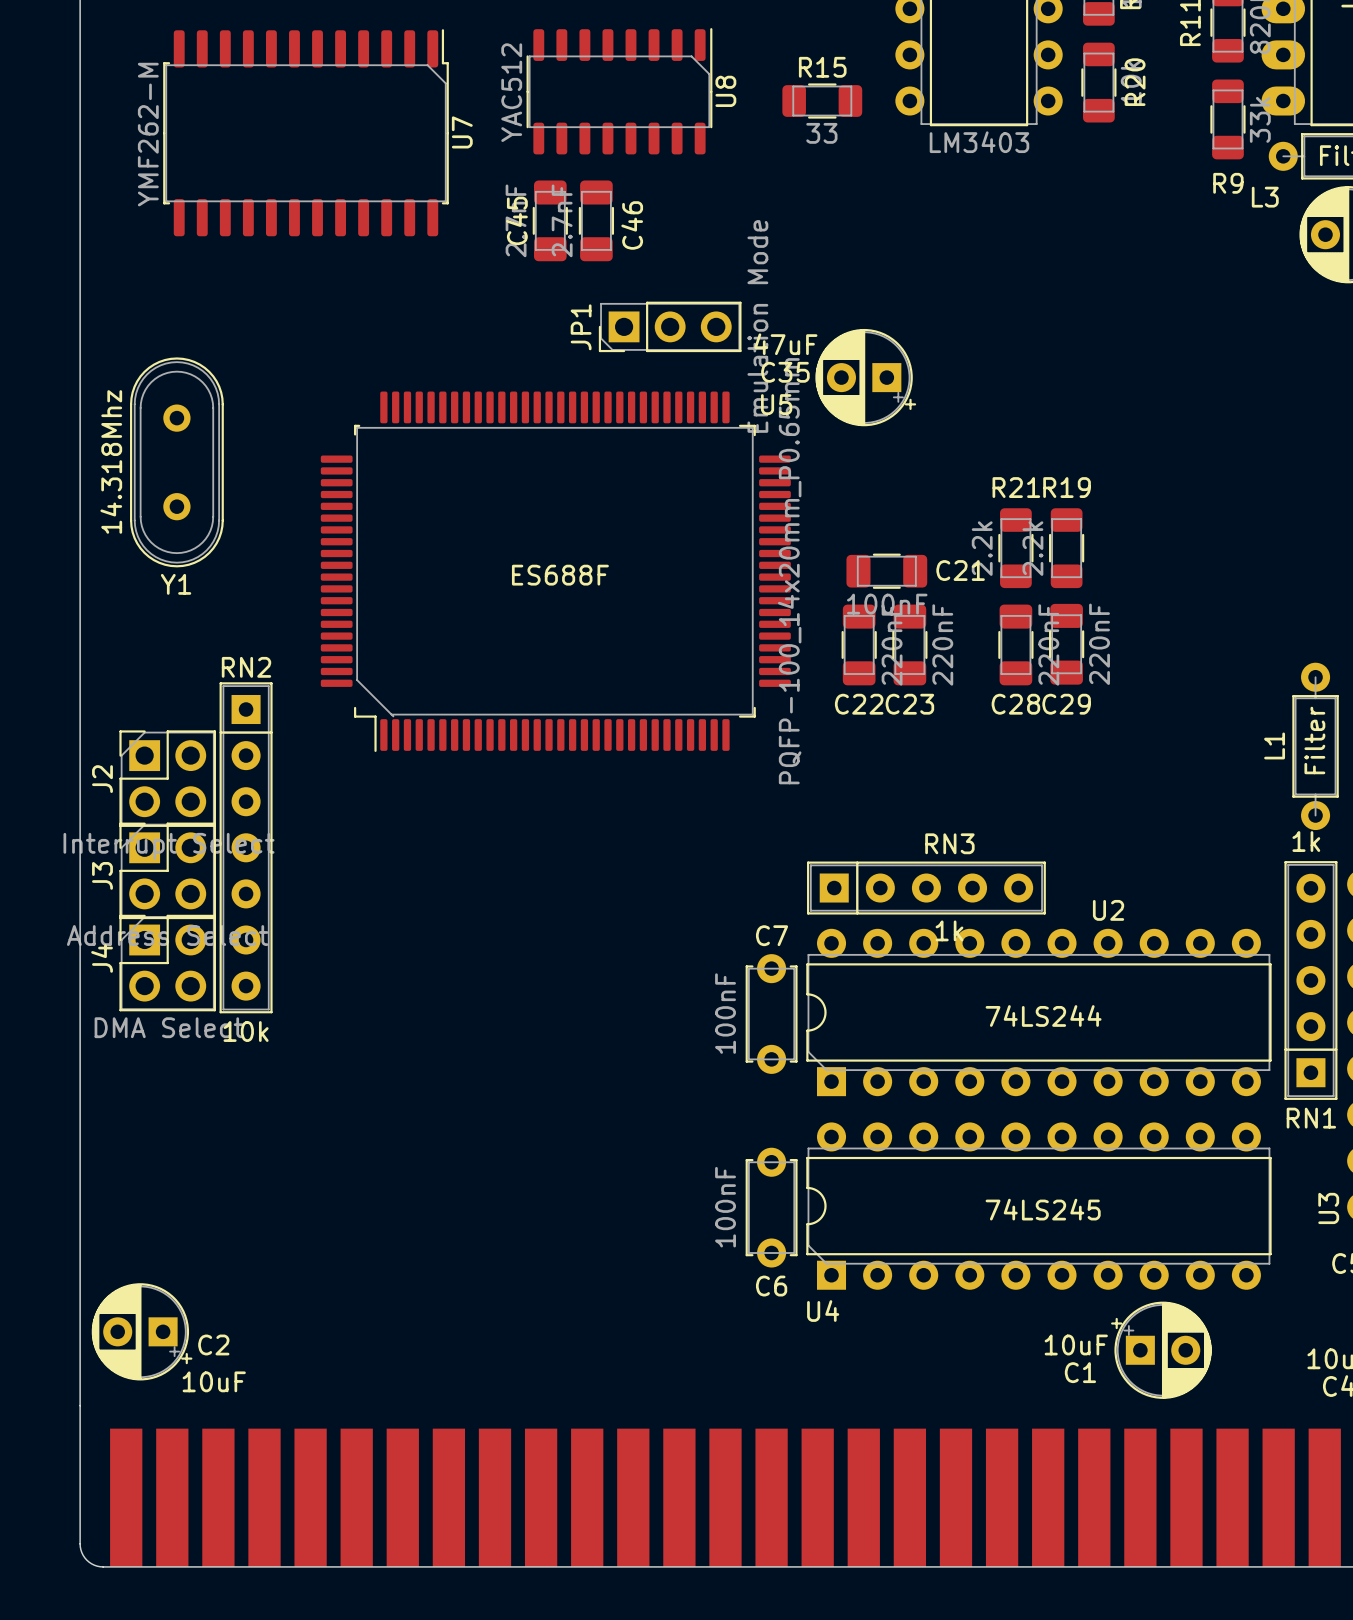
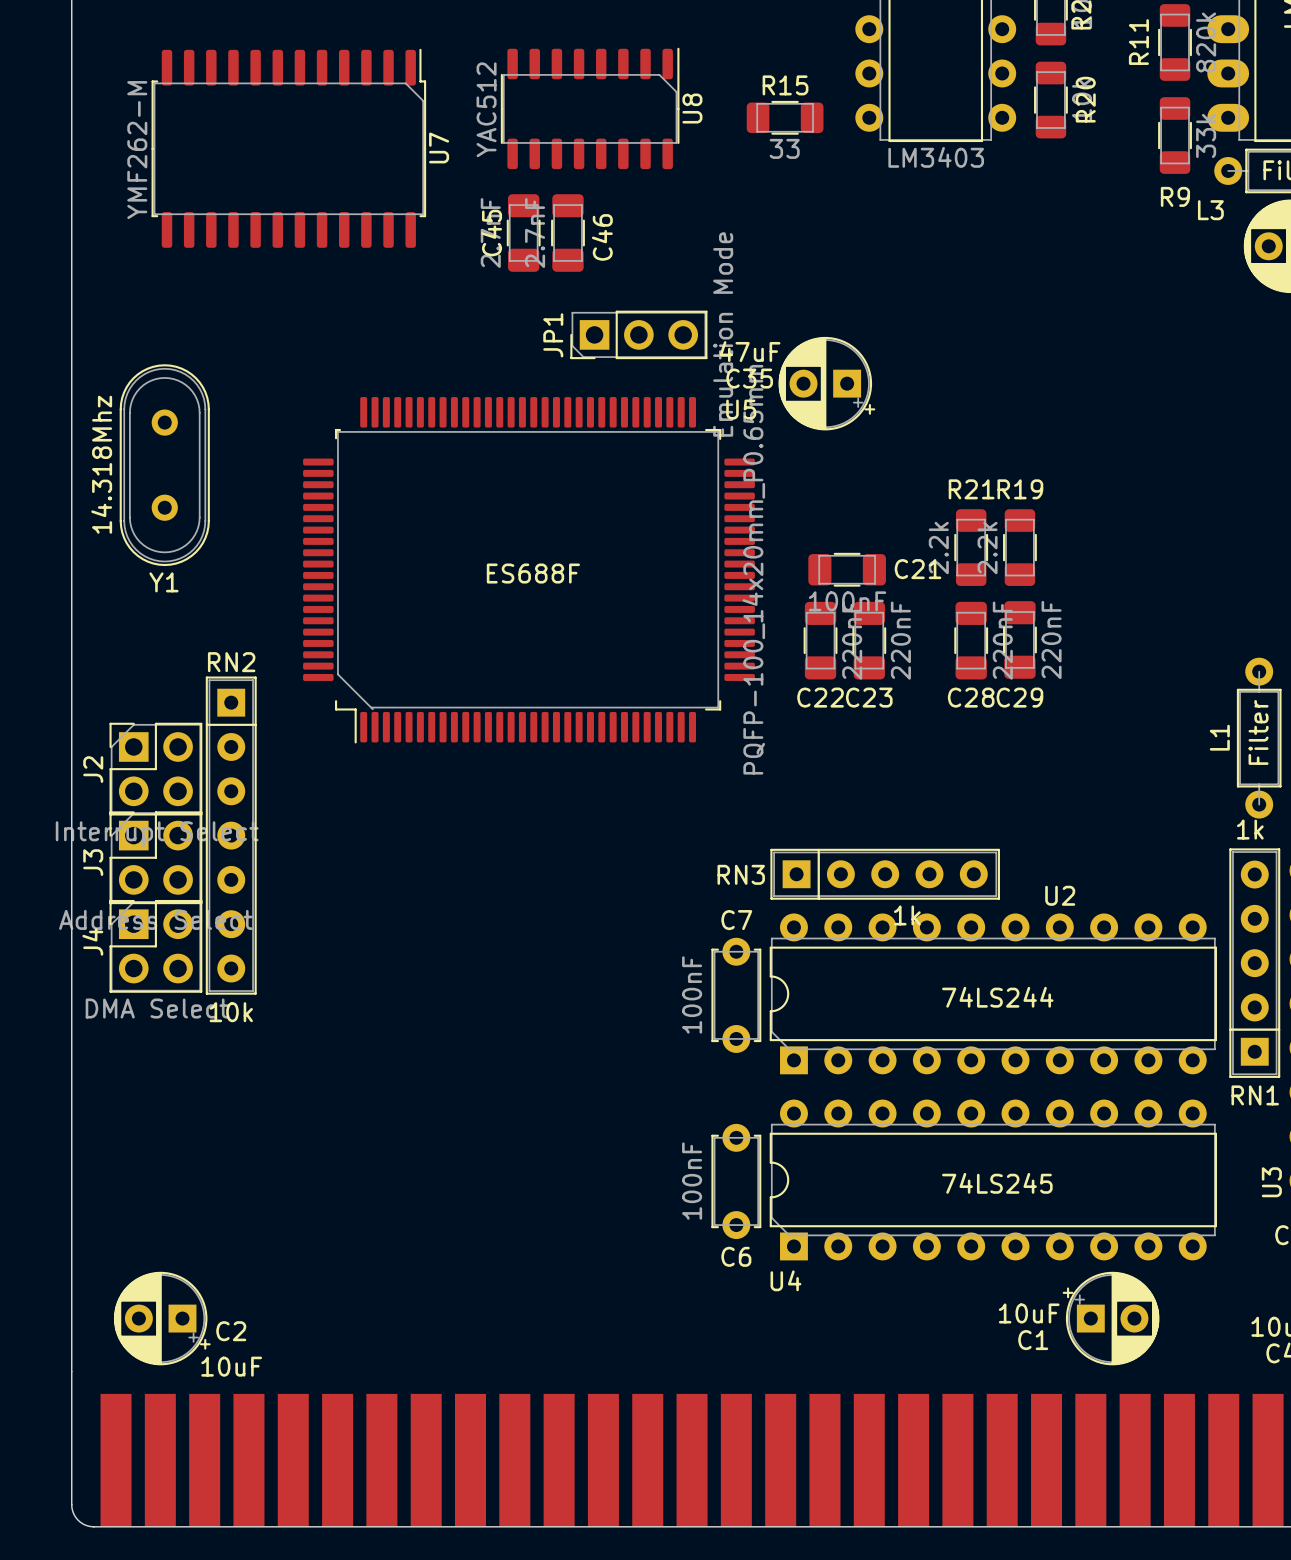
RN3 name position: RN3 (949, 843) -> RN3 (741, 874)
C2 position: (142, 1331) -> (162, 1318)

